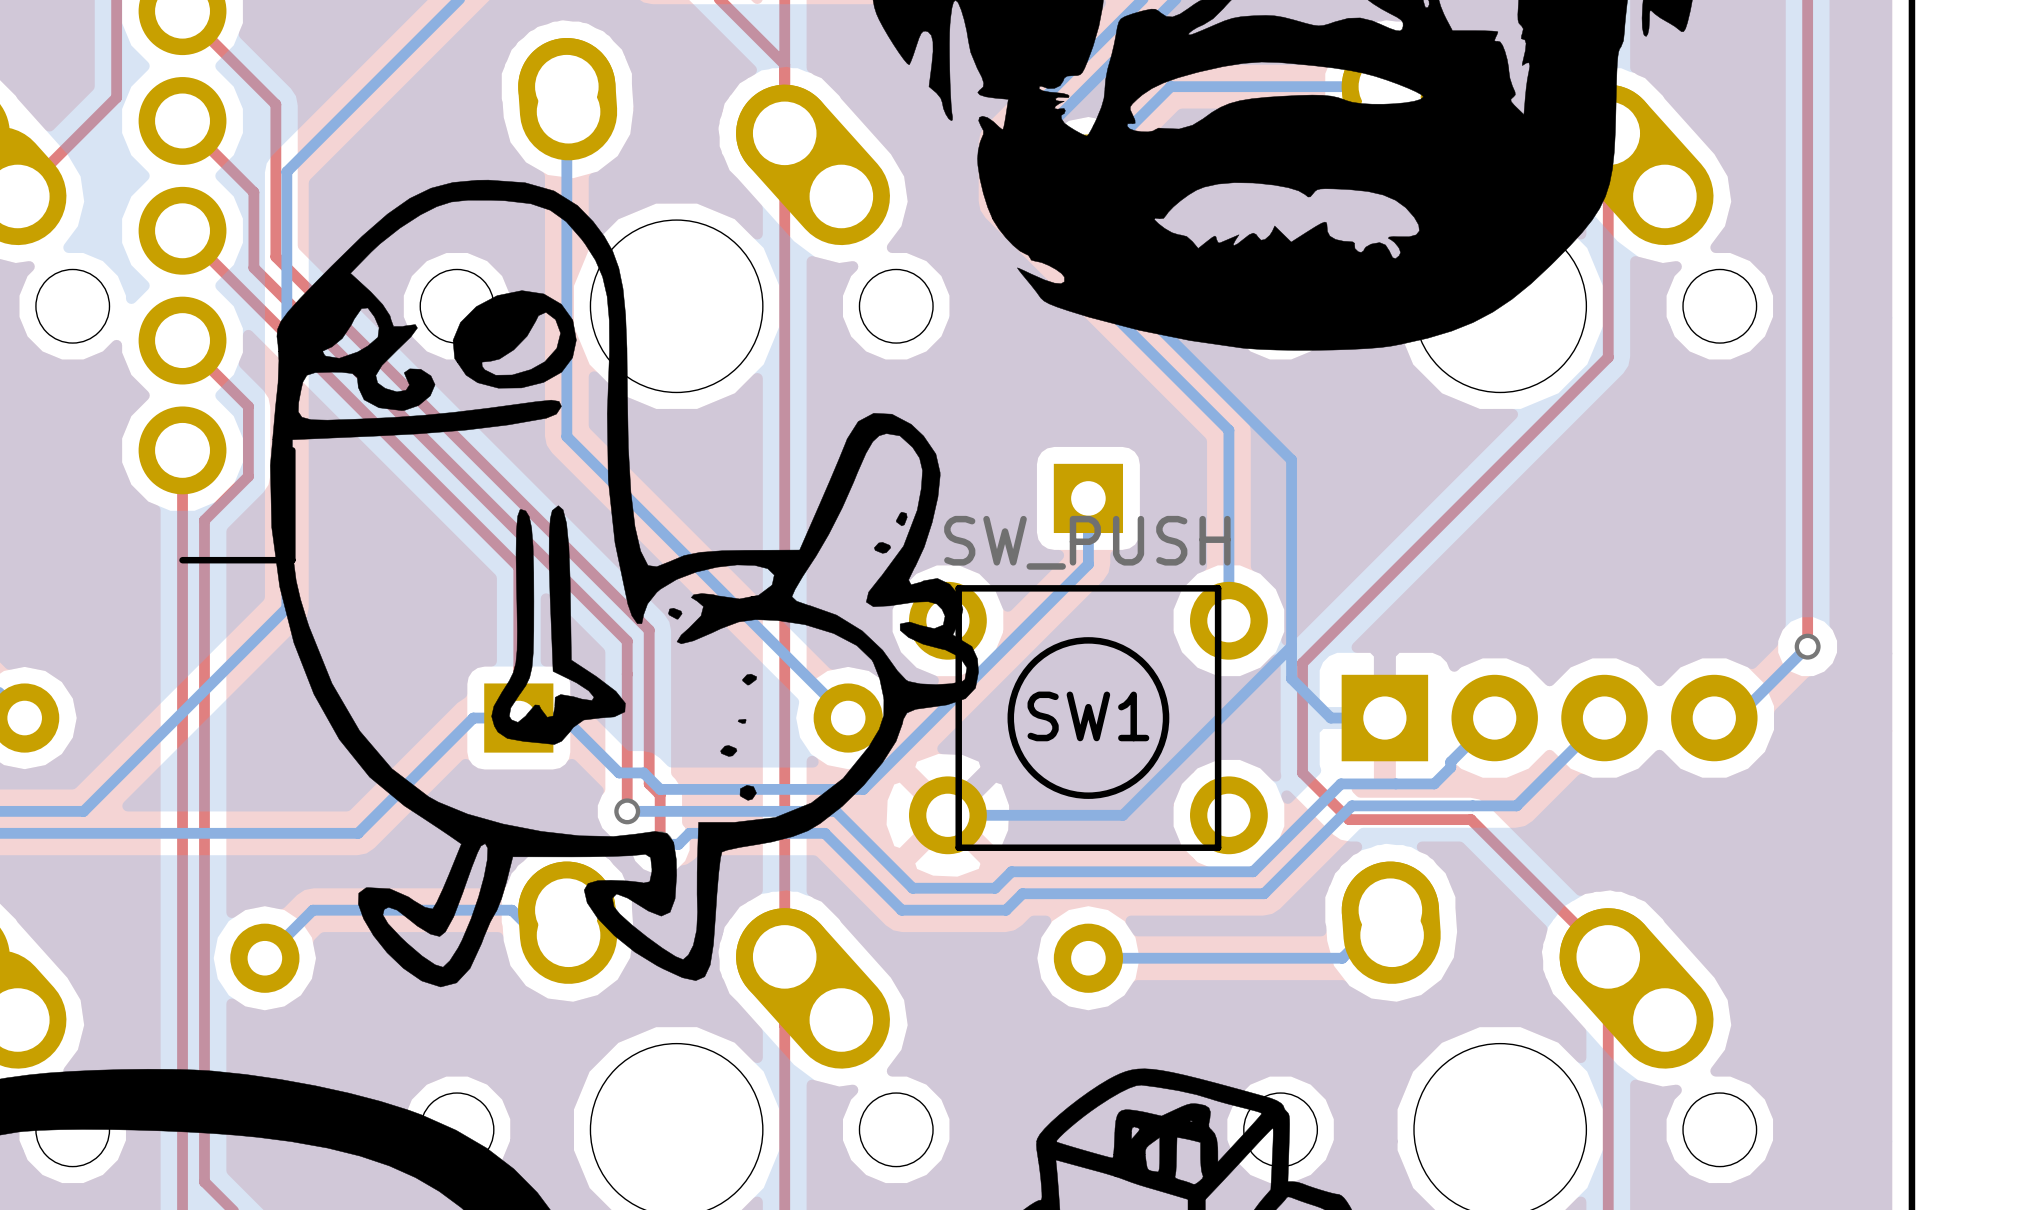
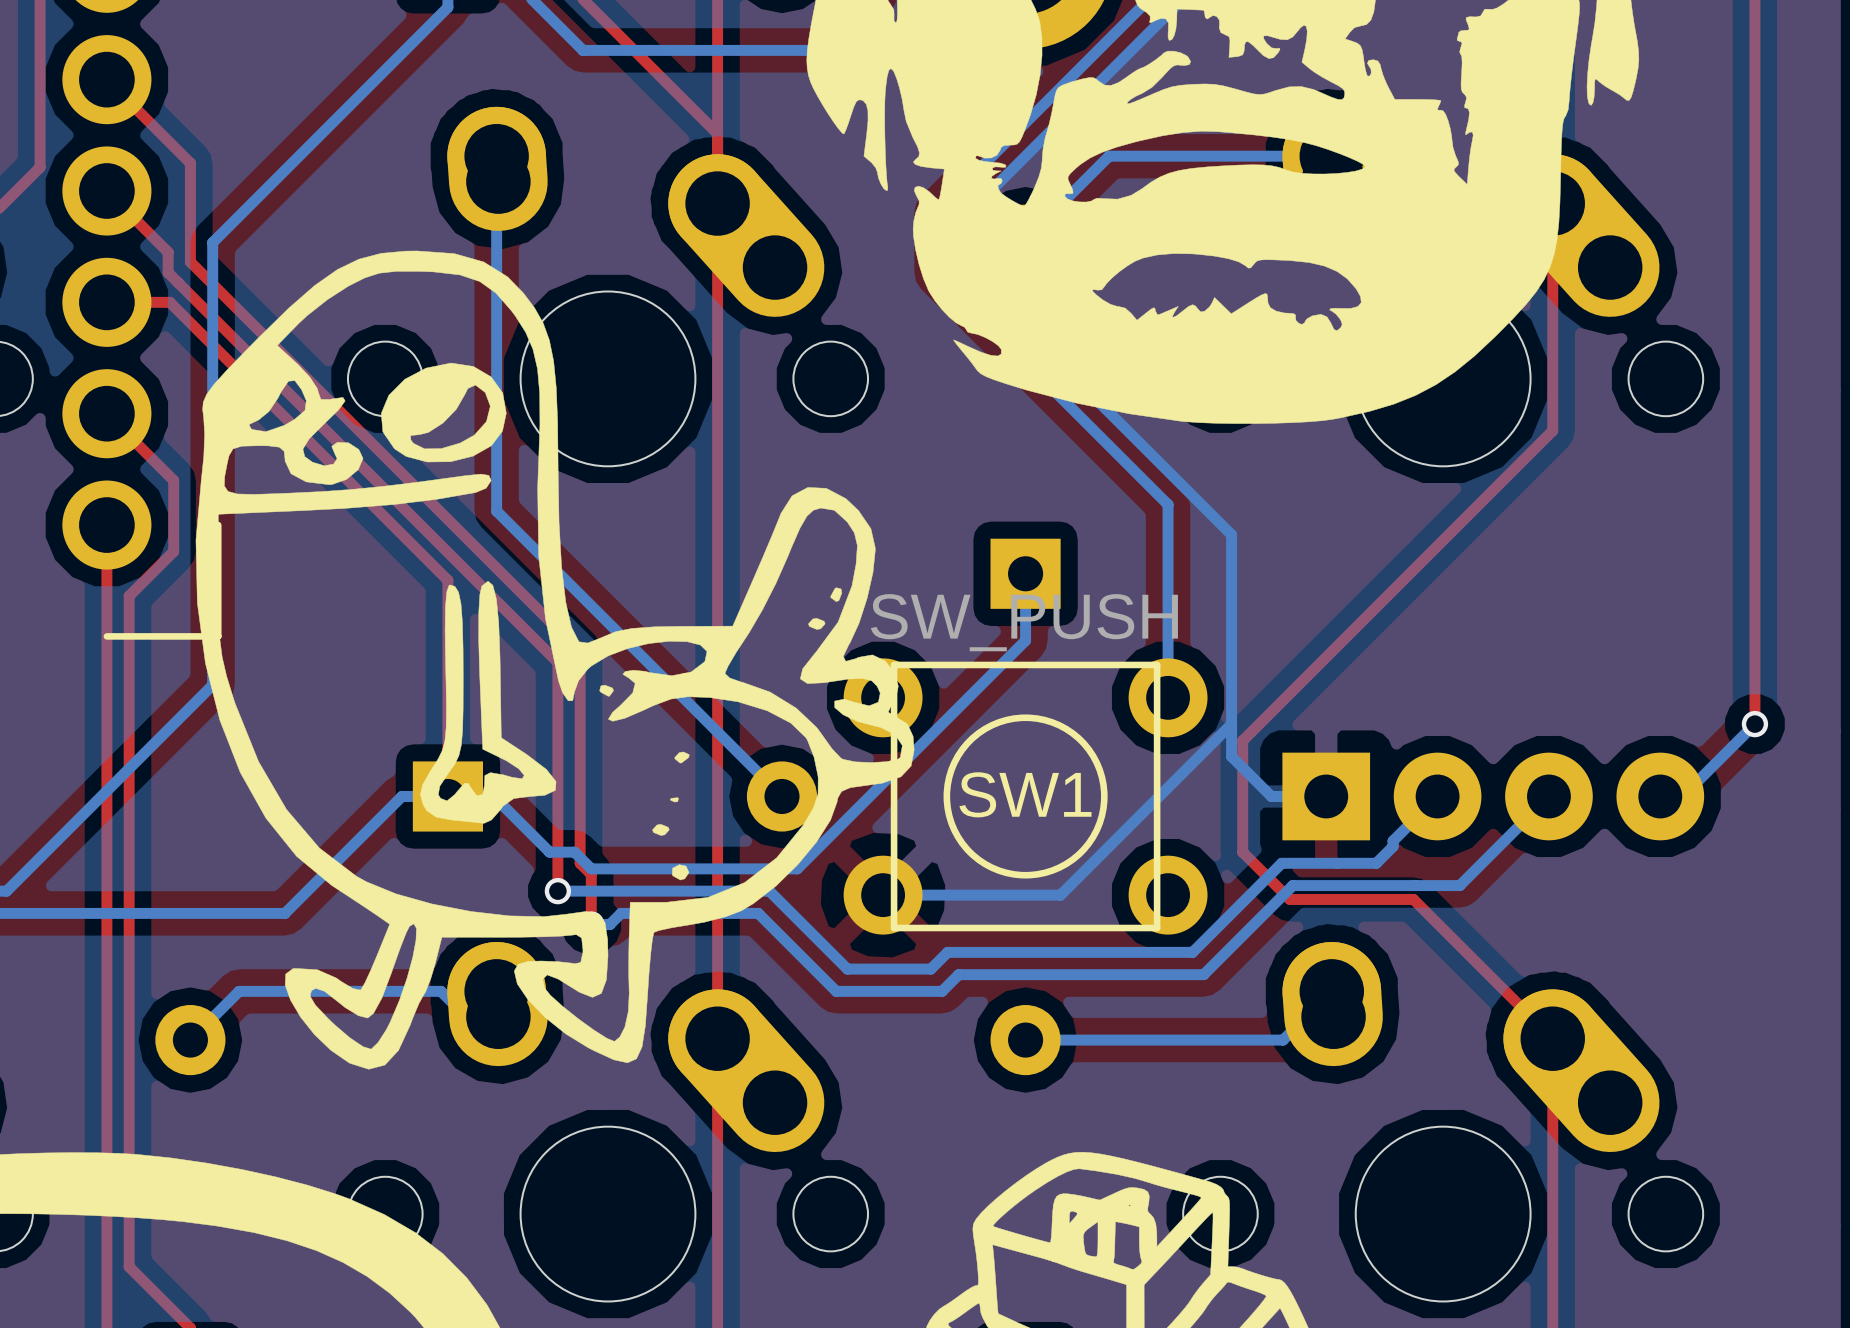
top track: (264, 93) (275, 104) (275, 256) (649, 630) -> (190, 163) (190, 261) (580, 651) (580, 707)
top track: (242, 181) (253, 192) (253, 267) (627, 641) -> (168, 252) (168, 272) (557, 662) (557, 718)
top track: (182, 230) (518, 567) -> (106, 302) (169, 302) (447, 580) (447, 643)

